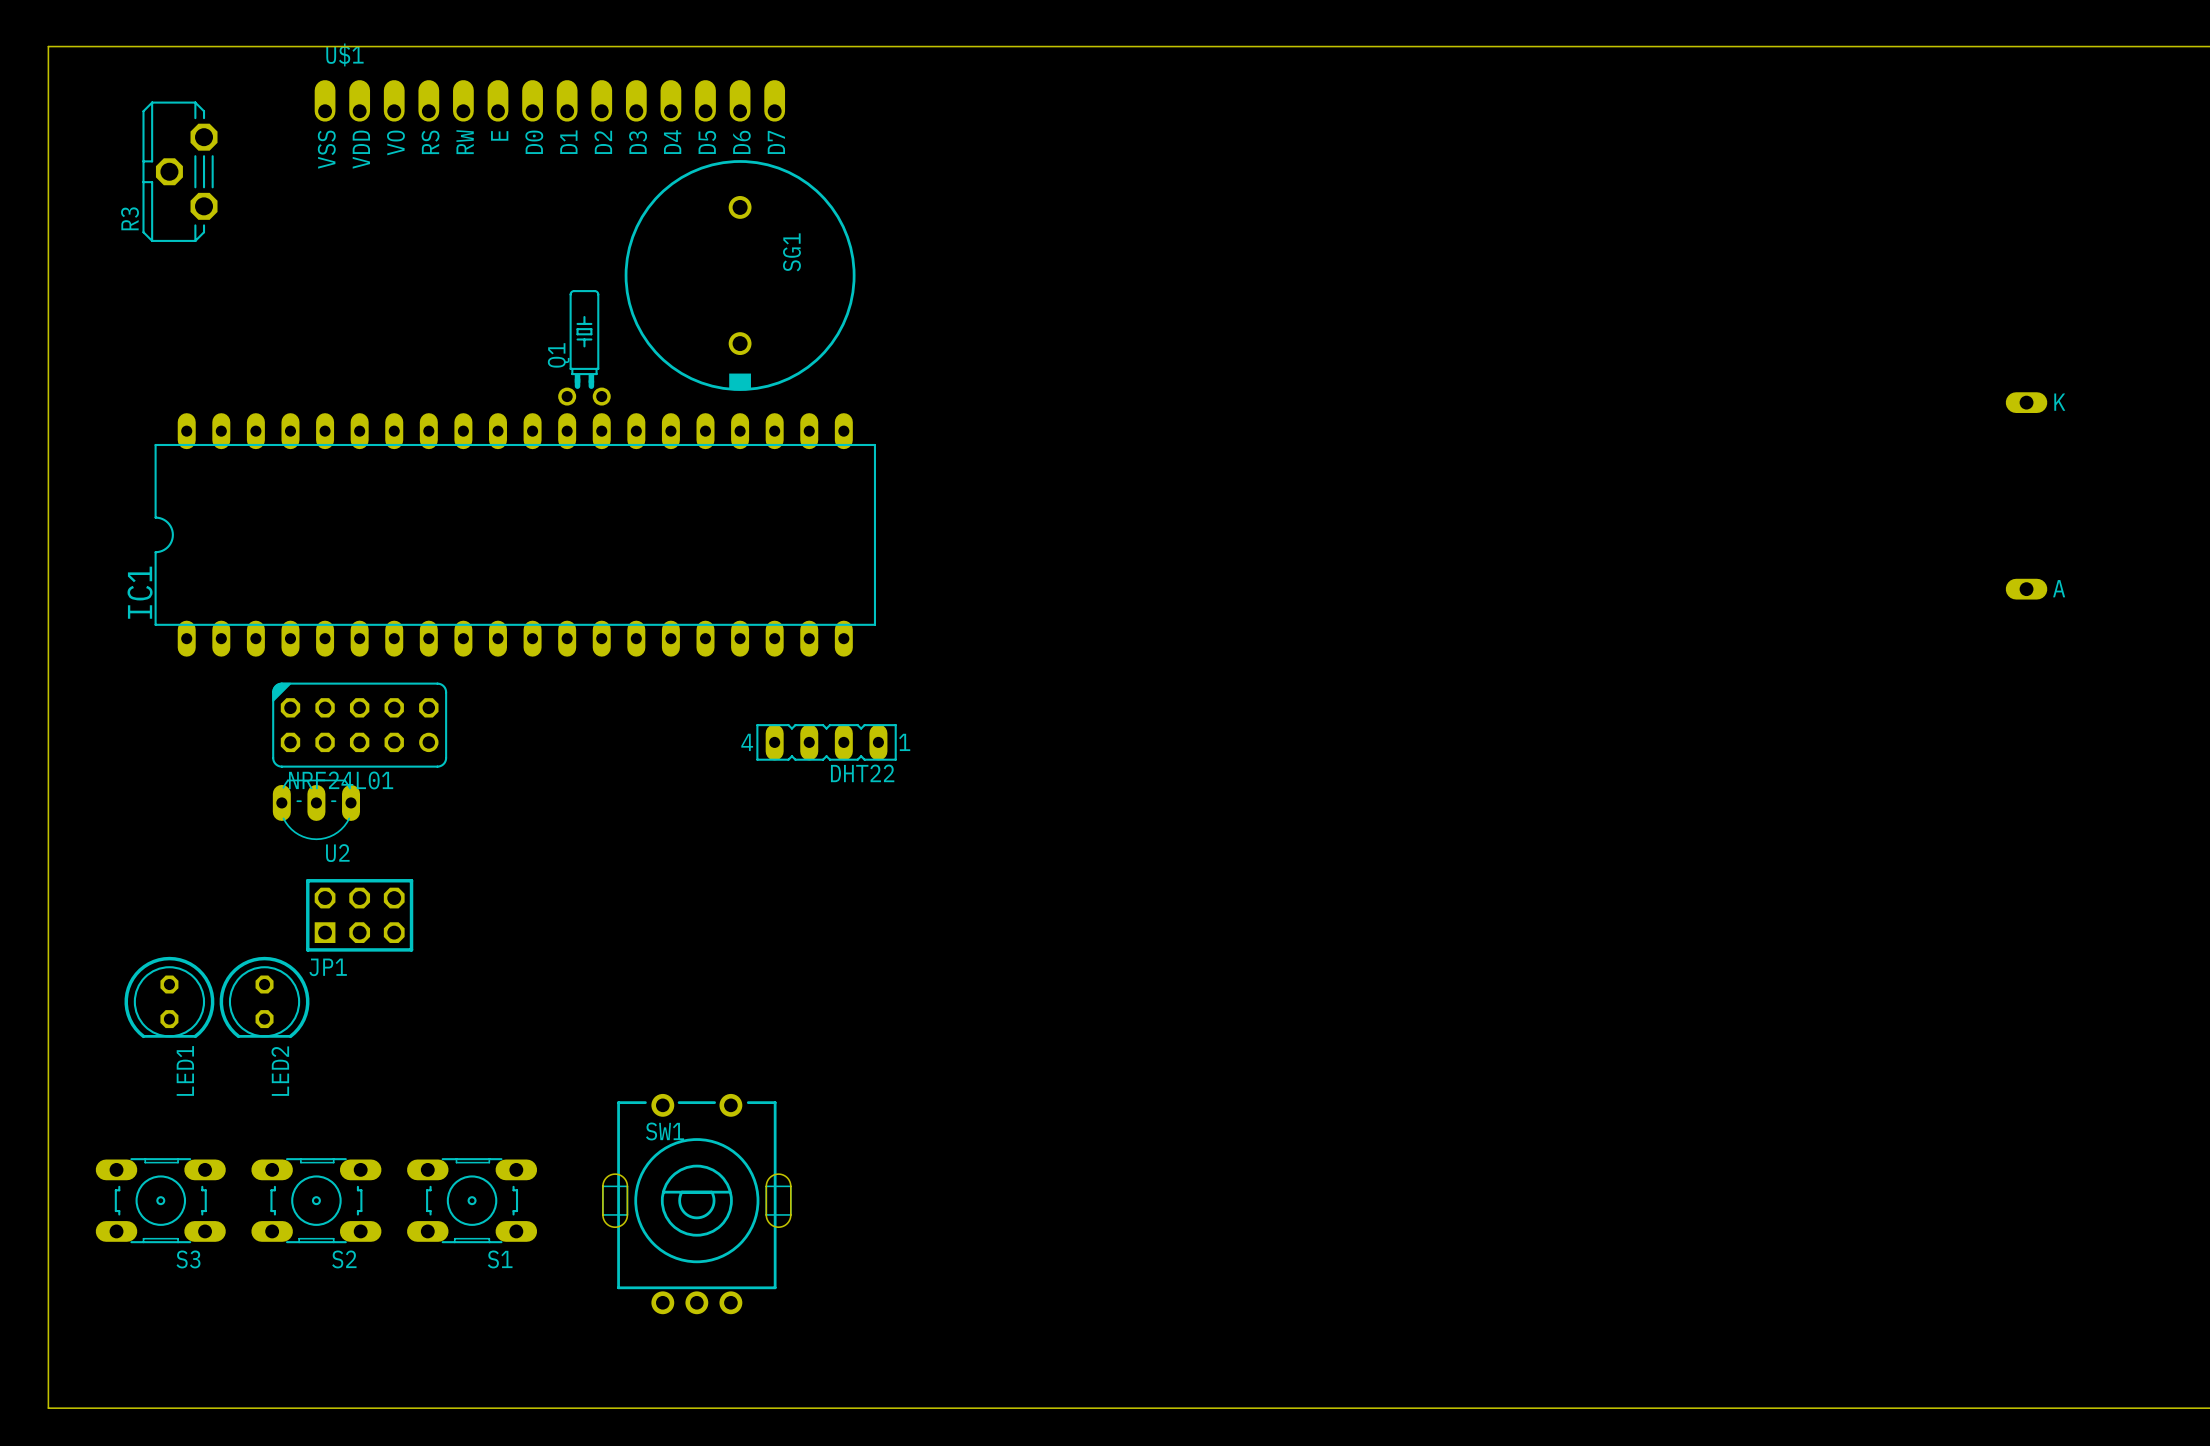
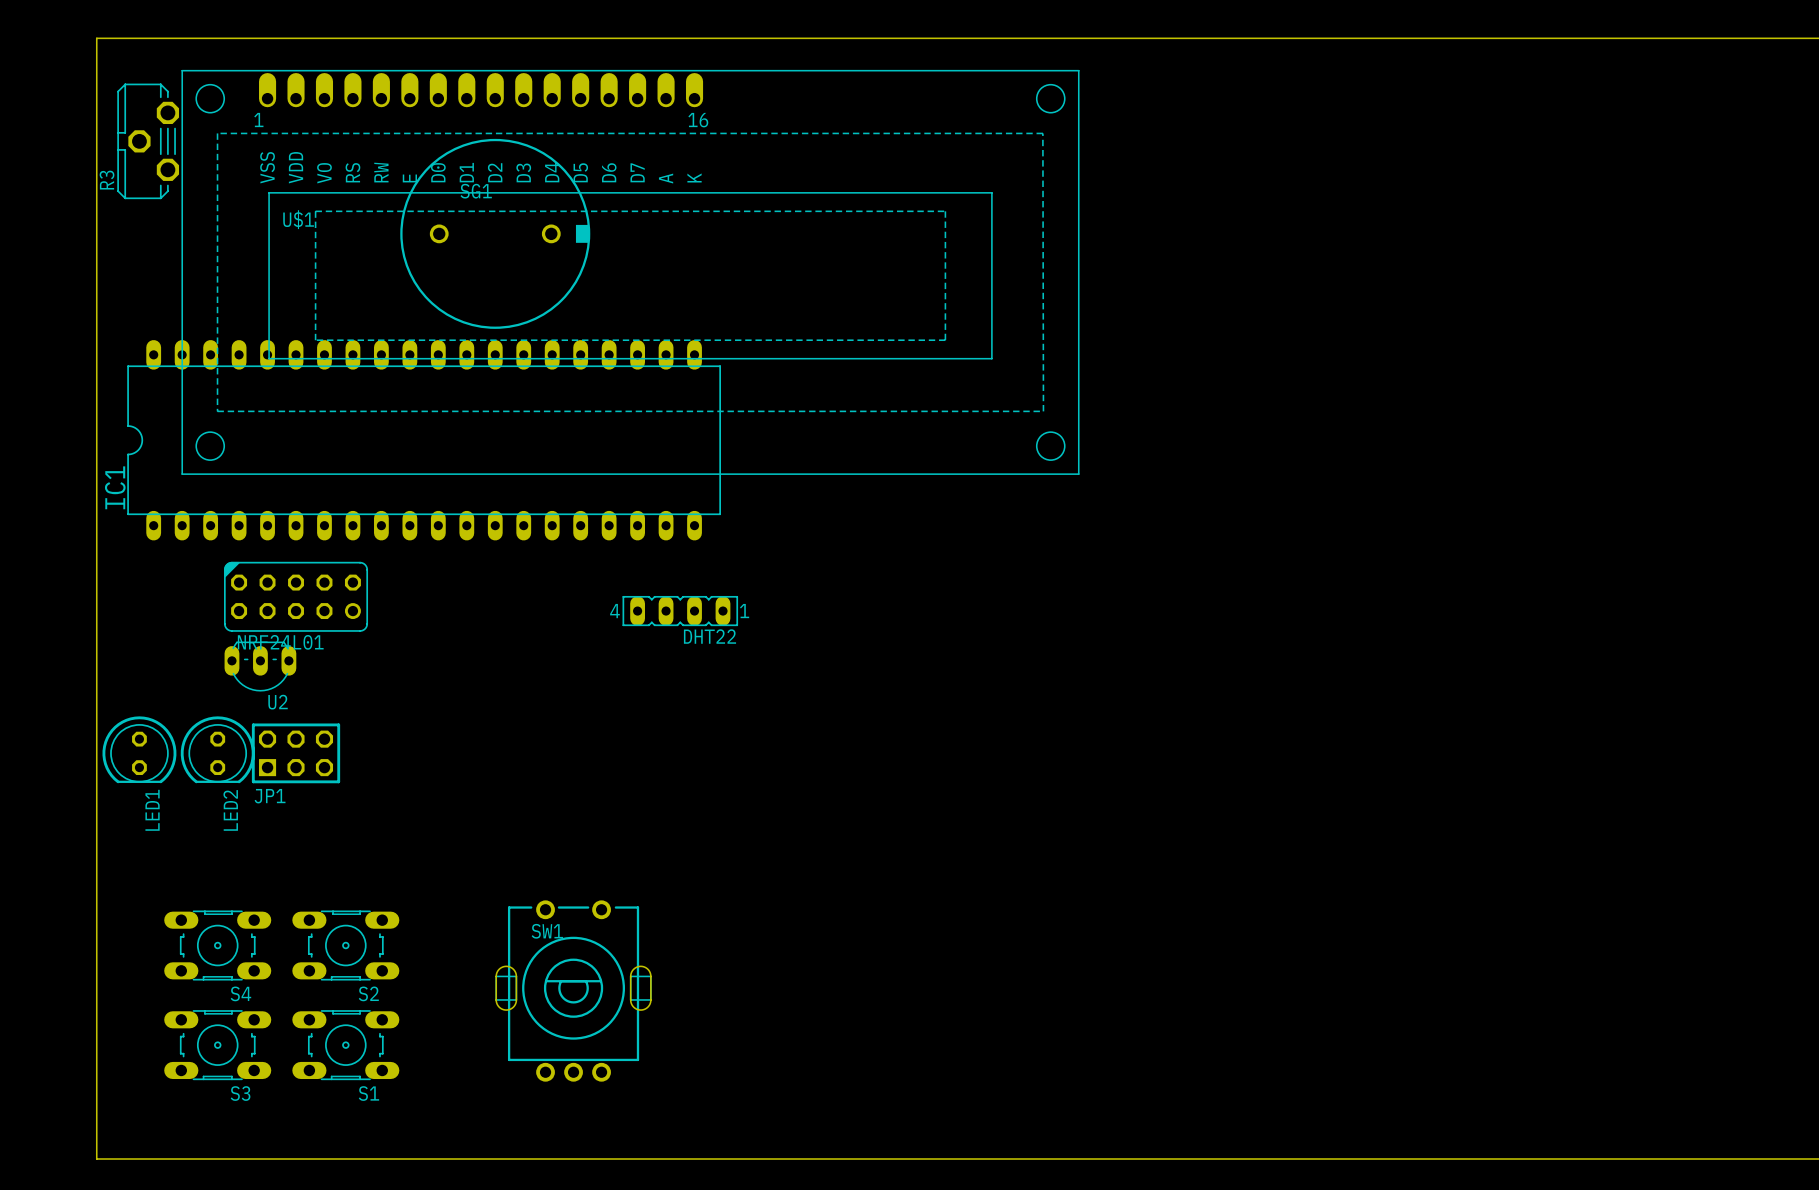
board edge: (117, 46) (48, 46) (48, 1408) (117, 1408) -> (96, 38) (96, 1159)
U$1 name position: U$1 (344, 54) -> U$1 (298, 219)
U$1 footprint: [314, 80, 2048, 600] -> [181, 69, 1080, 475]
SG1 rotation: 0° (740, 275) -> 90° counterclockwise (495, 233)
SG1 position: (740, 275) -> (495, 233)
Q1: (584, 347) -> none
LED1 position: (169, 997) -> (139, 749)
LED2 position: (264, 997) -> (217, 749)
S4: none -> (217, 945)
S3 position: (160, 1200) -> (217, 1045)
S2 position: (316, 1200) -> (345, 945)
S1 position: (472, 1200) -> (345, 1045)

